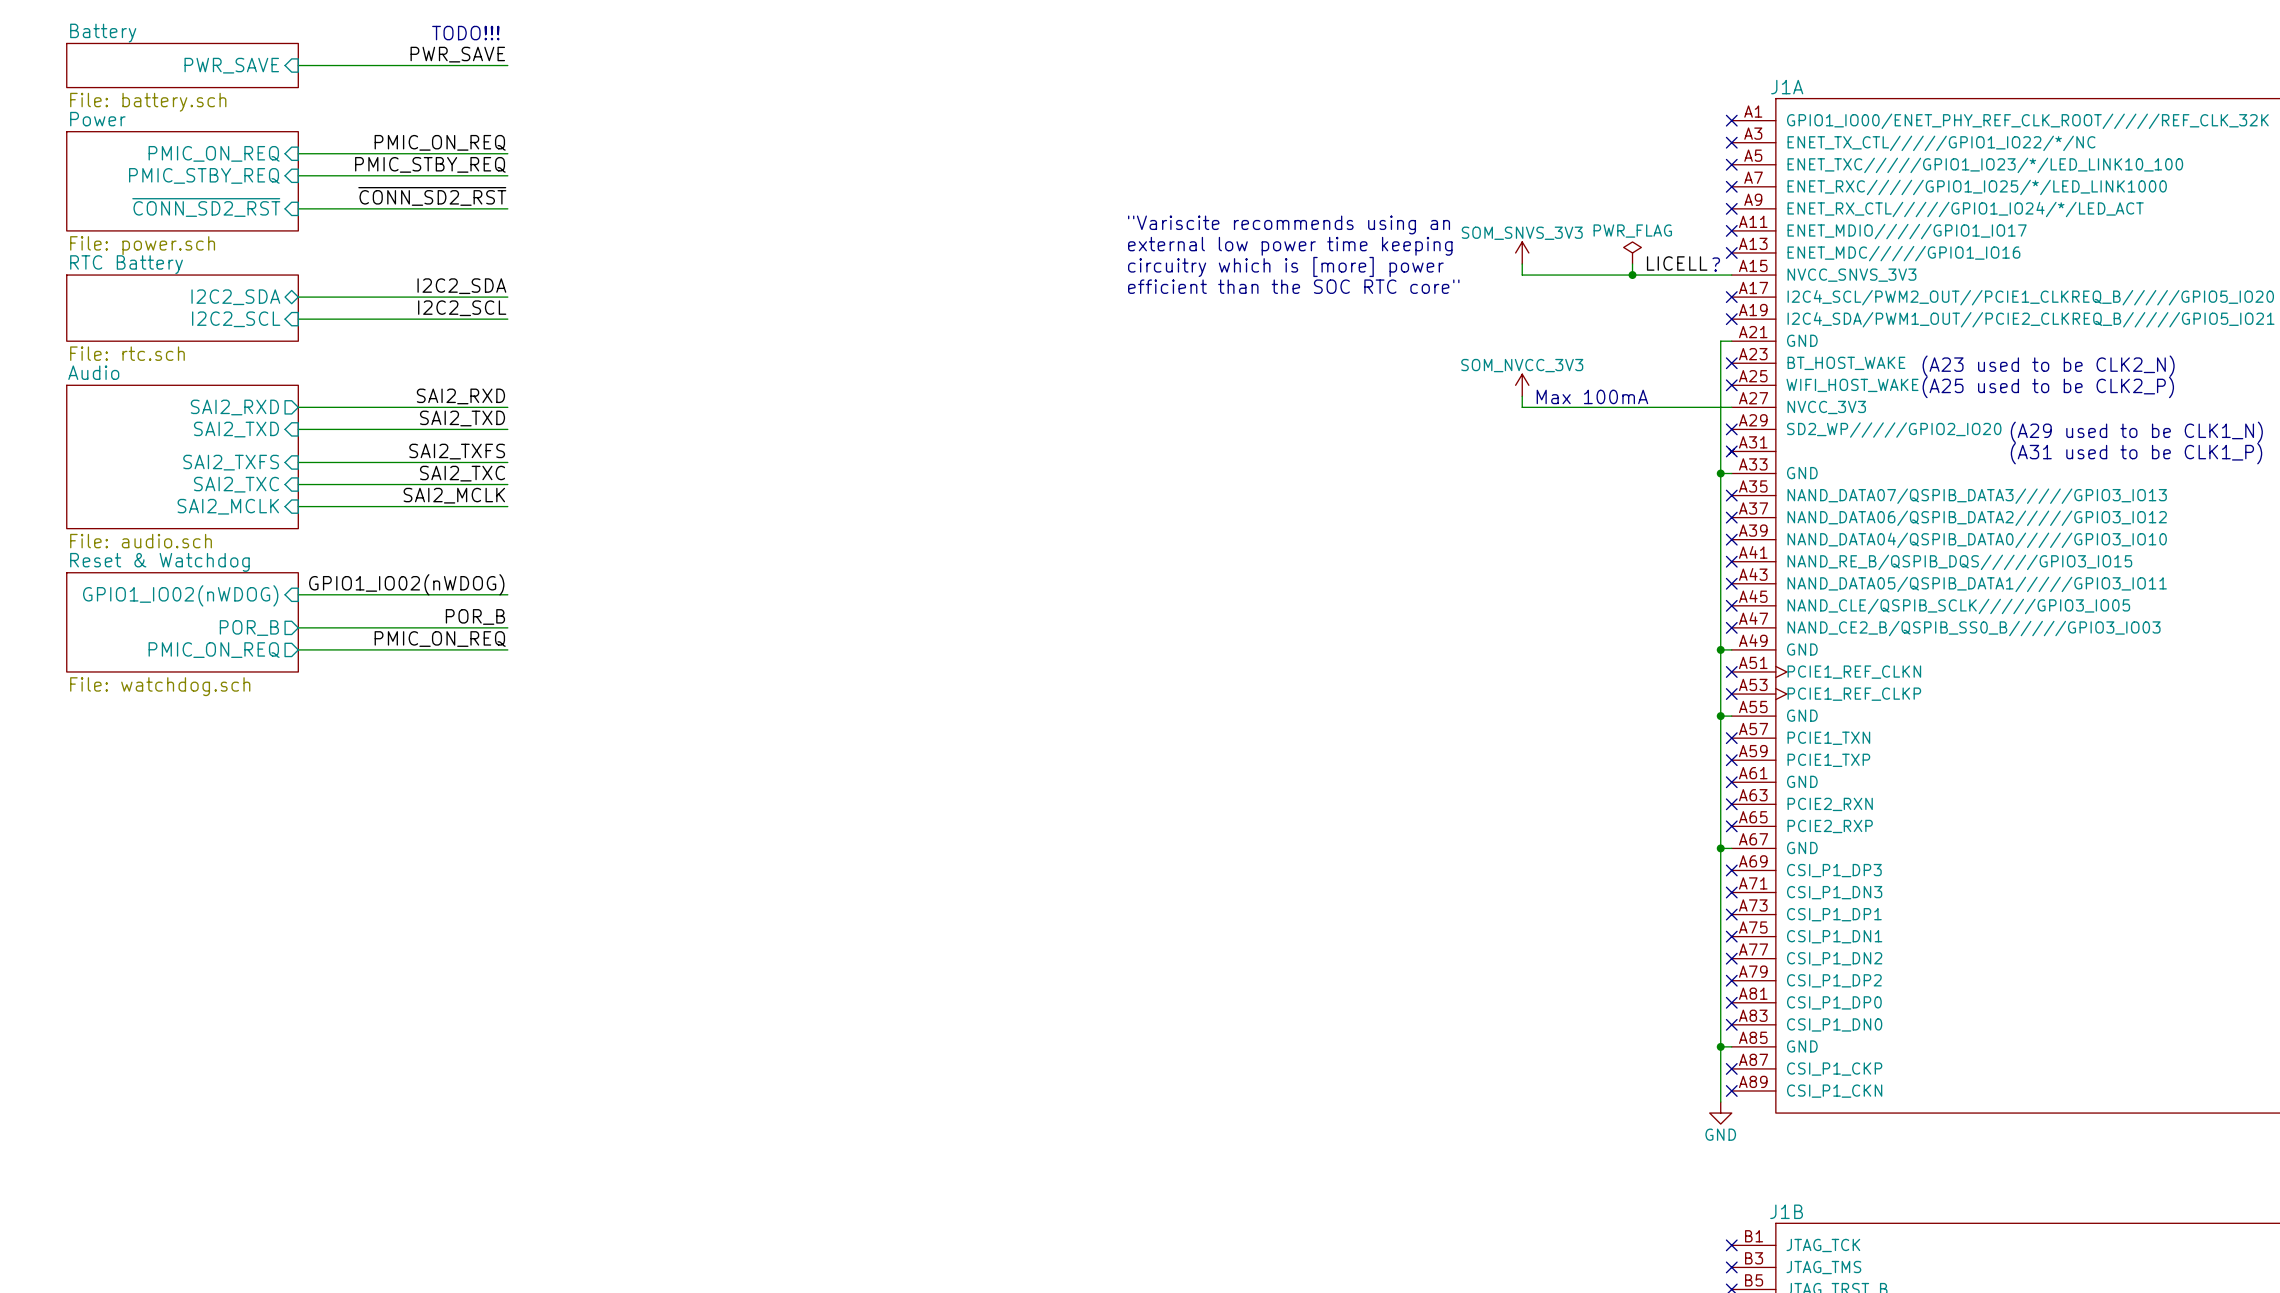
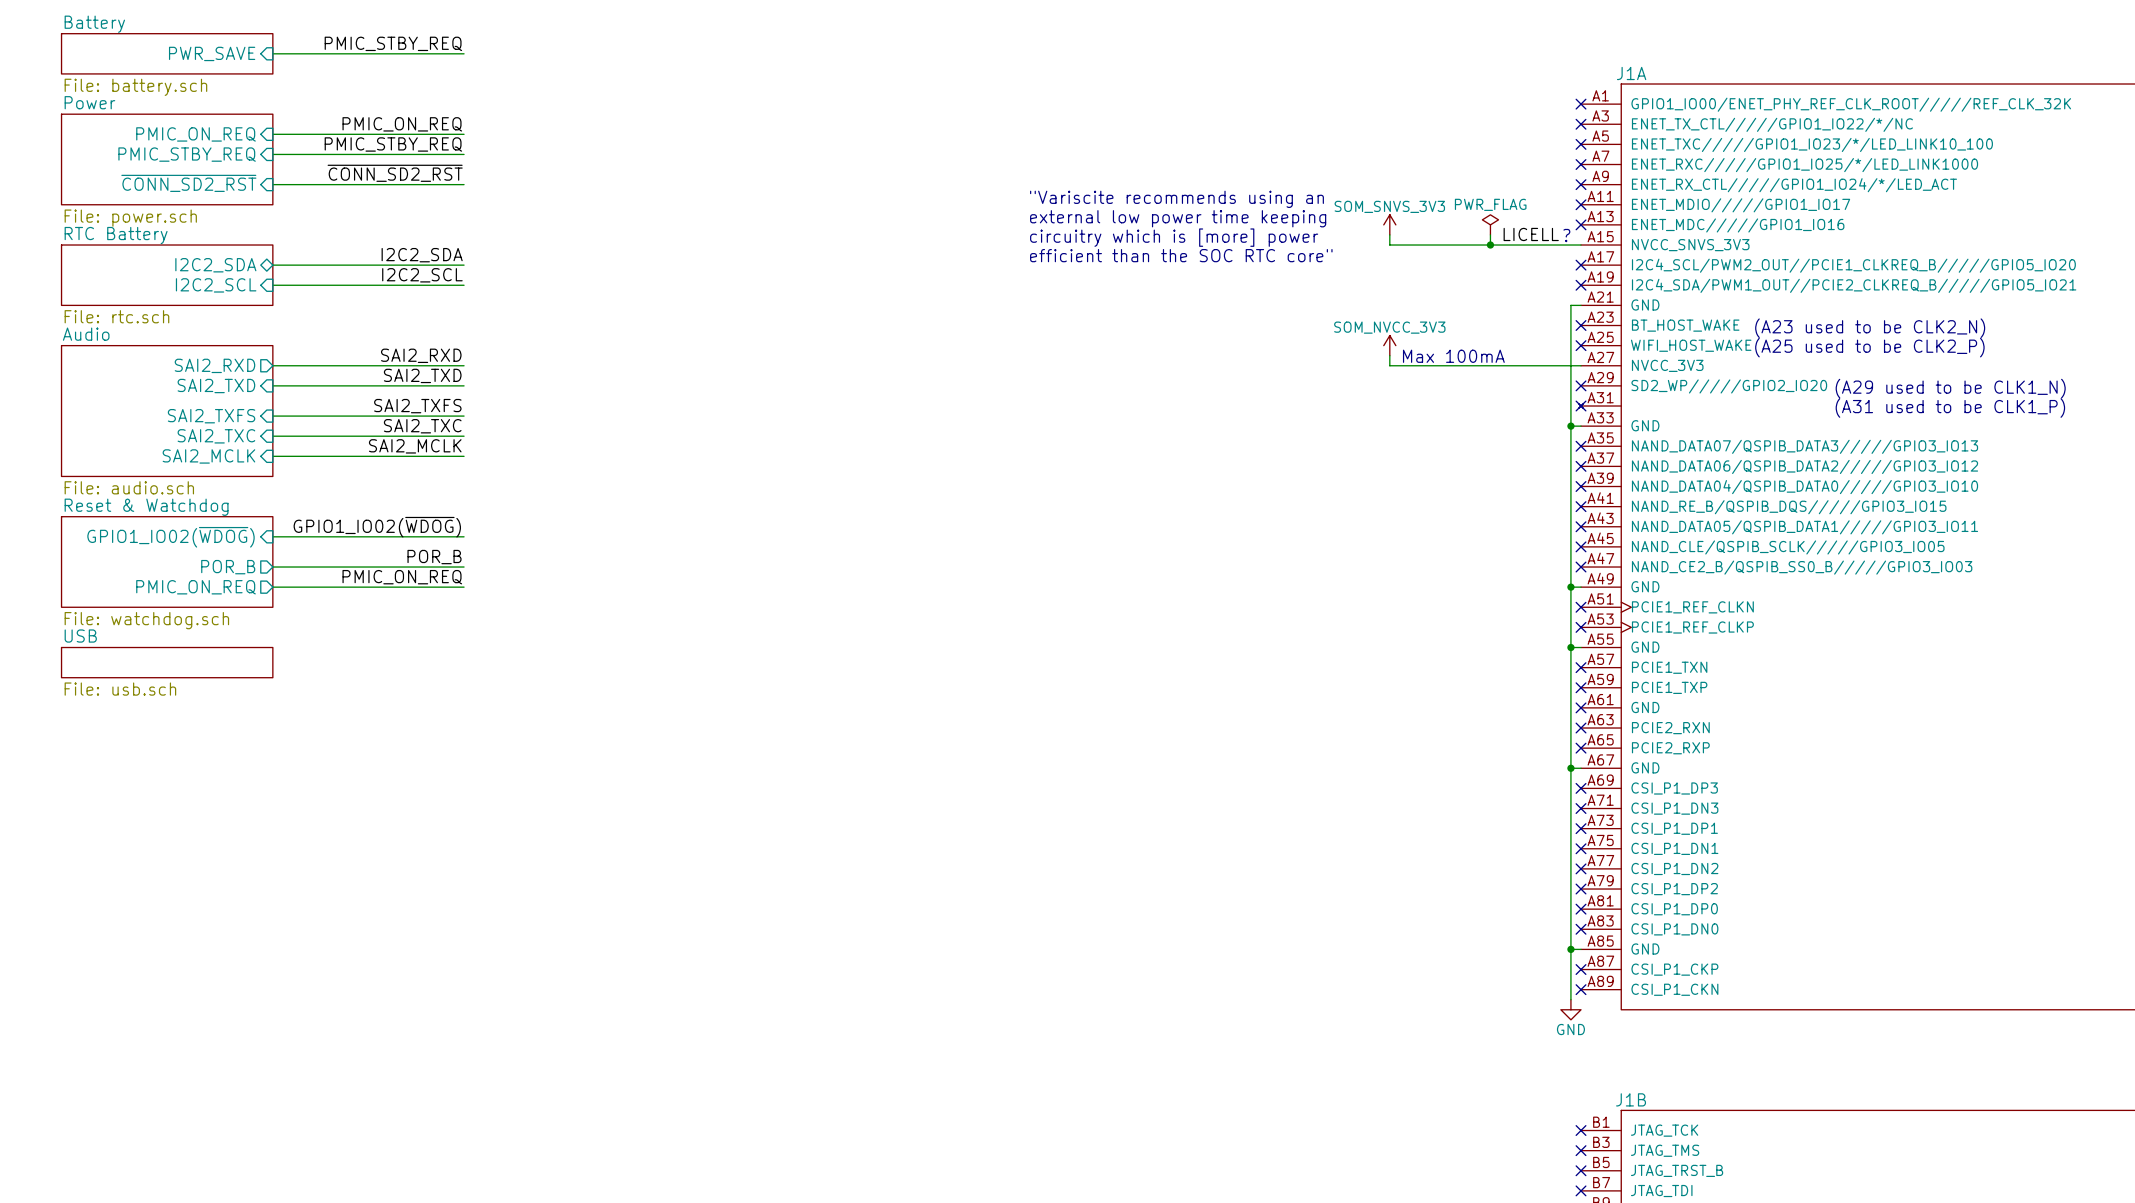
text: TODO!!! (465, 33) -> none
label: PWR_SAVE (457, 54) -> PMIC_STBY_REQ (393, 43)
label: GPIO1_IO02(nWDOG) (406, 584) -> GPIO1_IO02(~{WDOG}) (377, 527)
sheet pin: GPIO1_IO02(nWDOG) (180, 595) -> GPIO1_IO02(~{WDOG}) (171, 537)
sheet USB: none -> File: usb.sch (167, 662)

